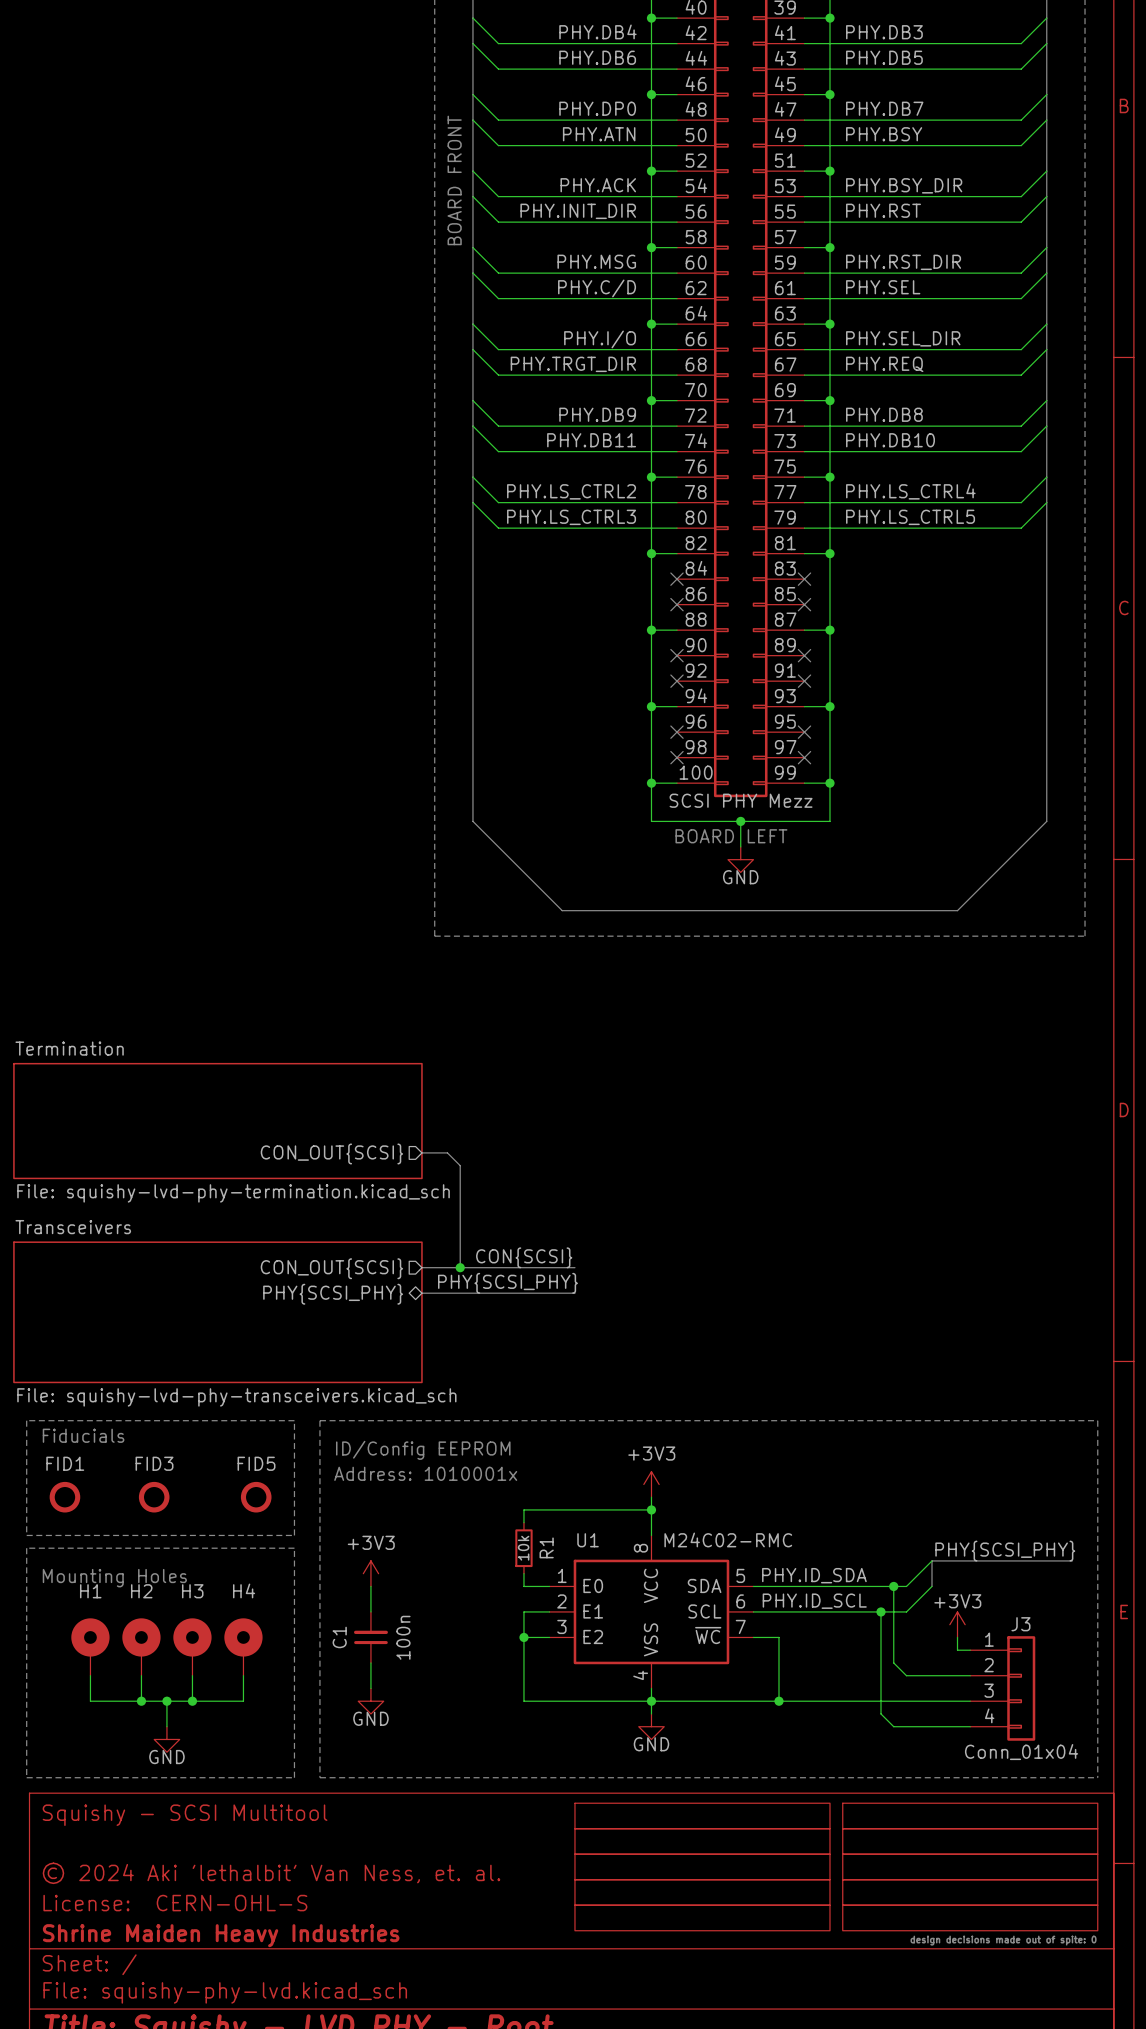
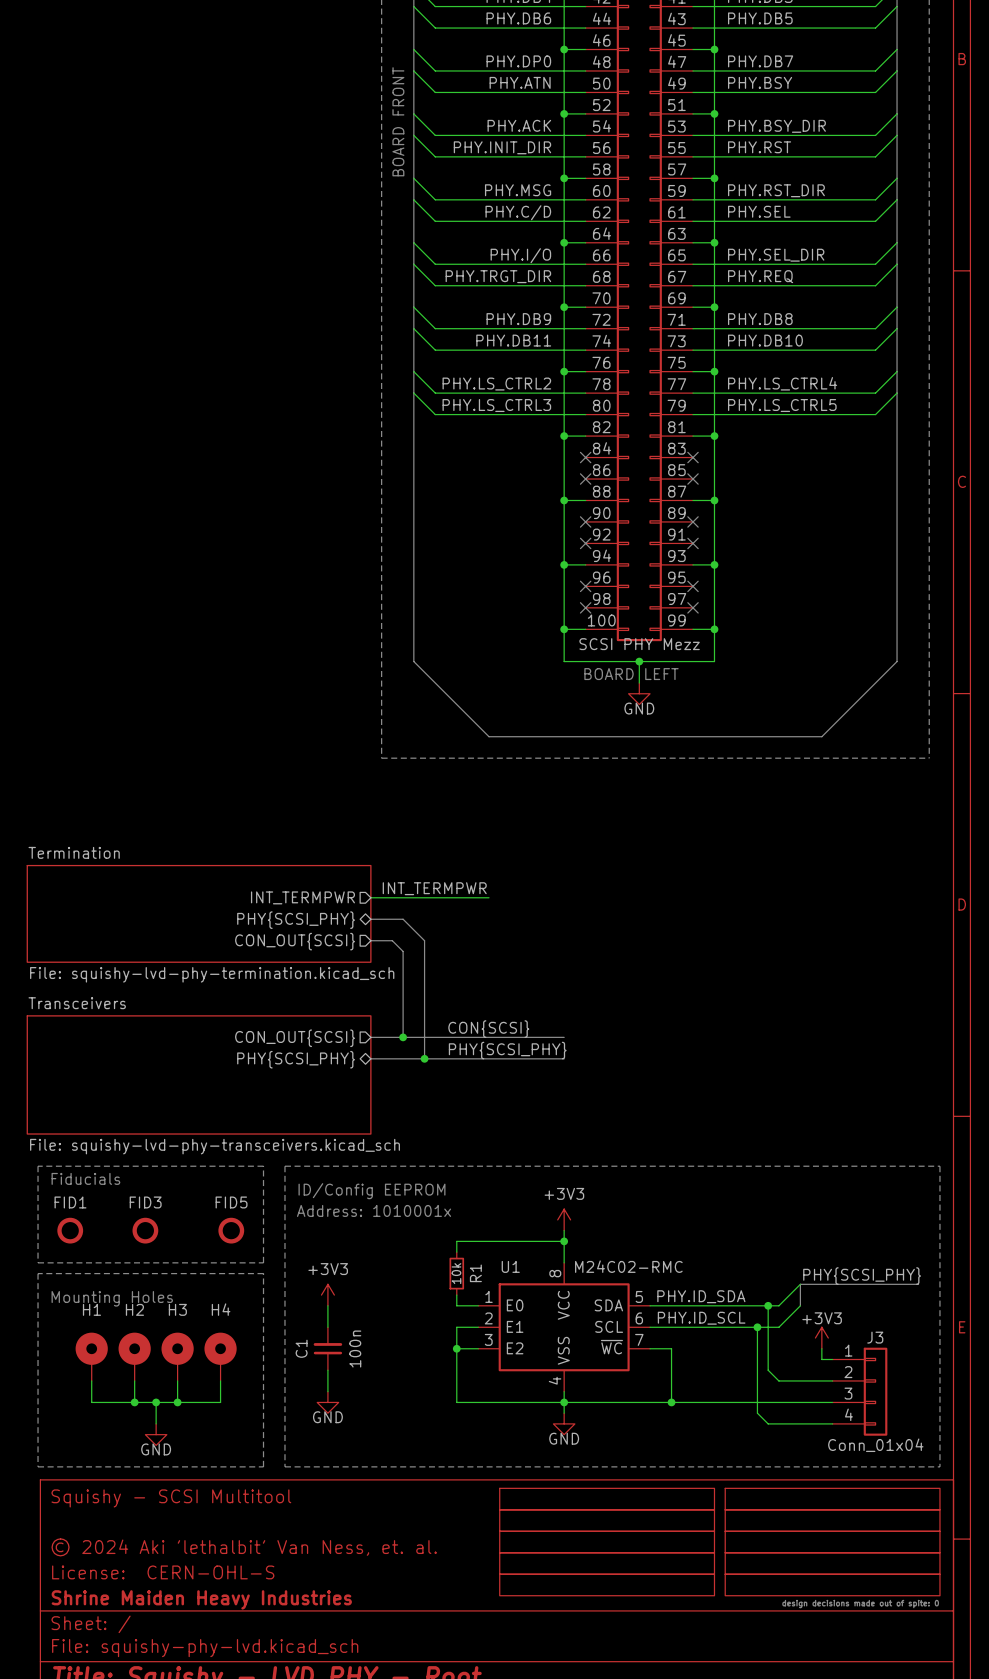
label: none -> INT_TERMPWR (434, 888)
wire: none -> (370, 897) (489, 897)
sheet pin: none -> INT_TERMPWR (302, 897)
bus: none -> (370, 919) (403, 919) (424, 940) (424, 1058)
sheet pin: none -> PHY{SCSI_PHY} (296, 920)
label position: CON{SCSI} (524, 1257) -> CON{SCSI} (488, 1029)
bus: none -> (499, 1037) (564, 1037)
label position: PHY{SCSI_PHY} (507, 1283) -> PHY{SCSI_PHY} (507, 1050)
junction: none -> (424, 1058)
bus: none -> (499, 1058) (564, 1058)

